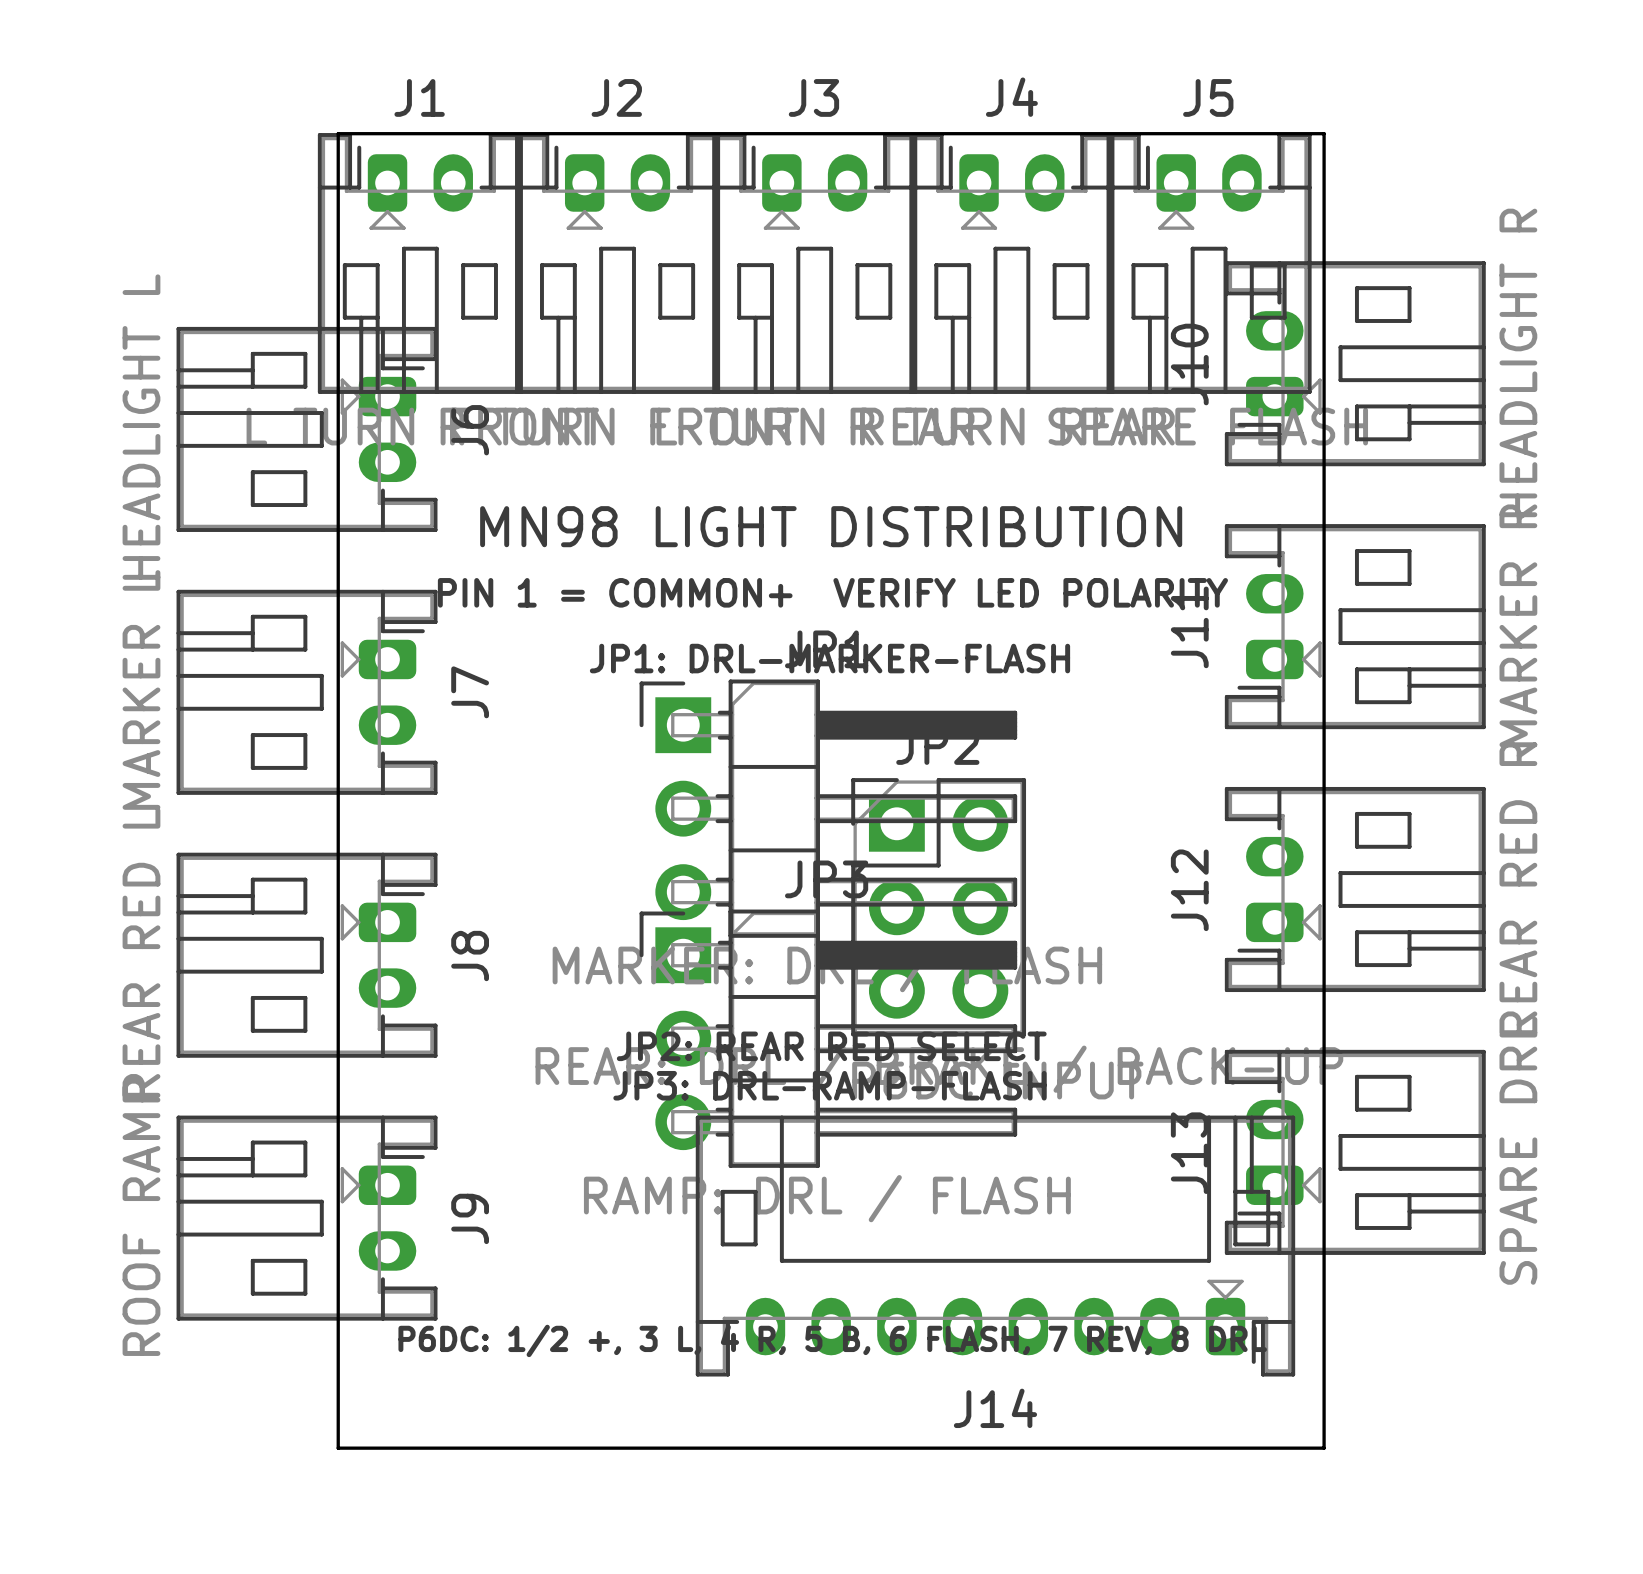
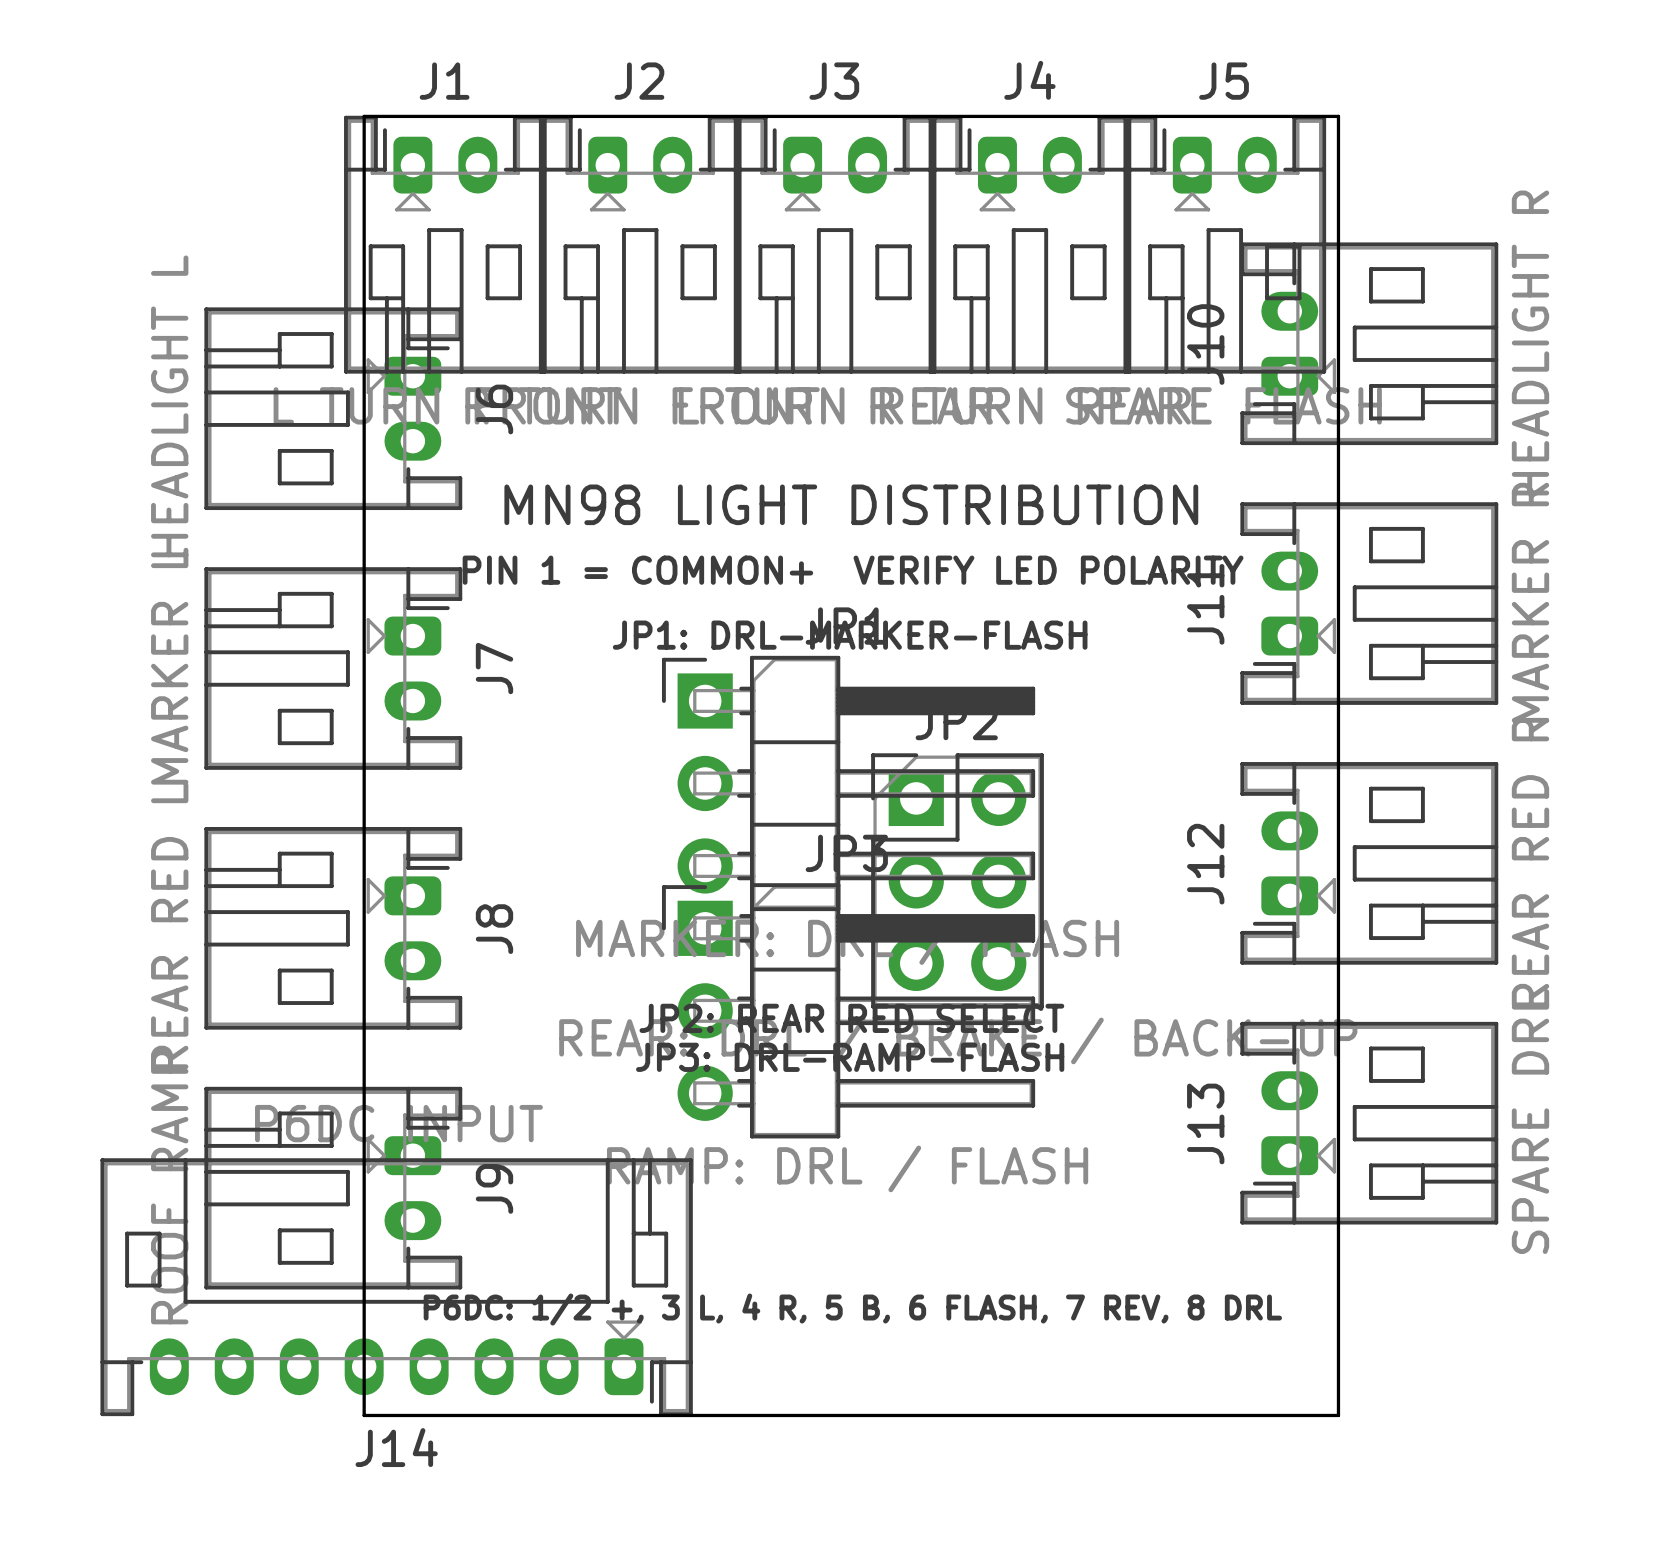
J14 position: (995, 1246) -> (396, 1287)

